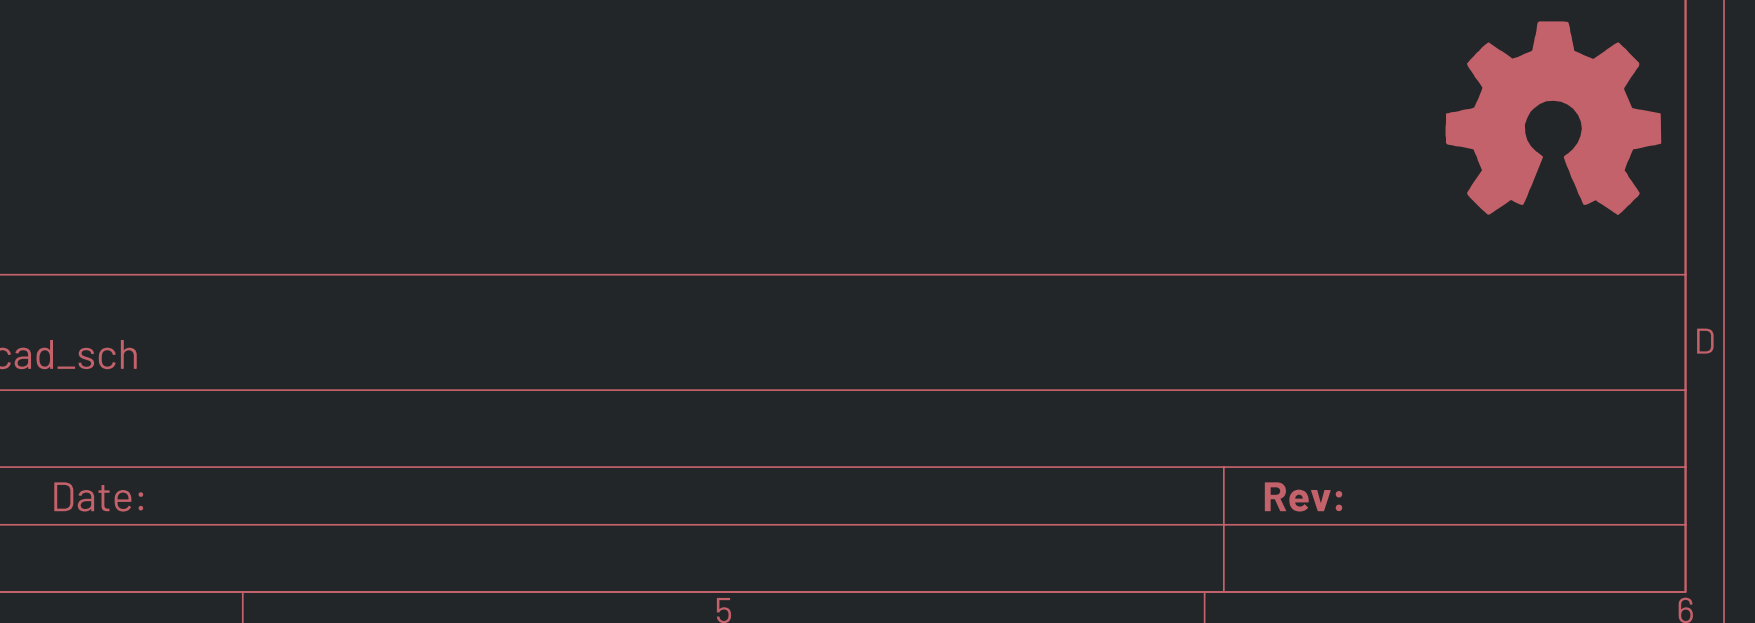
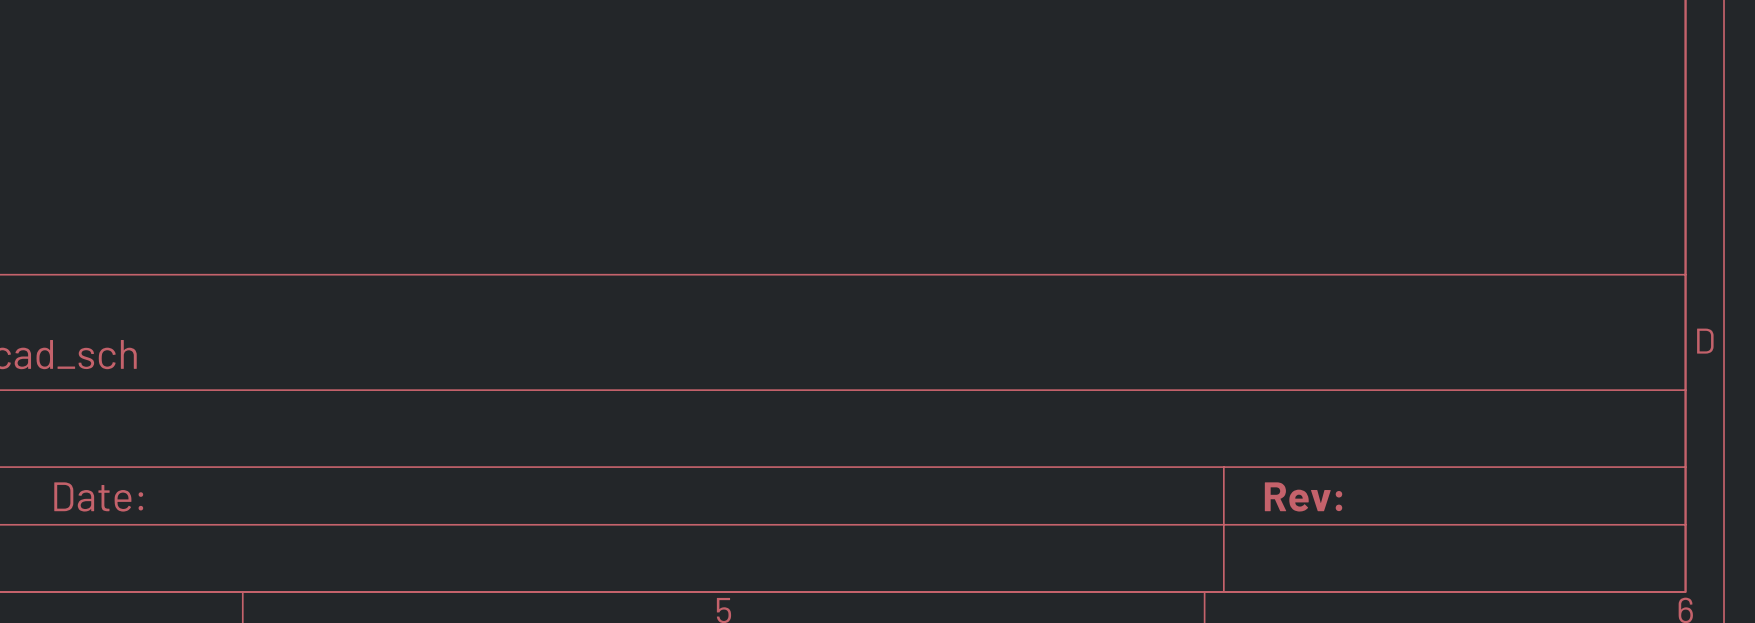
power symbol: (1553, 118) -> none

